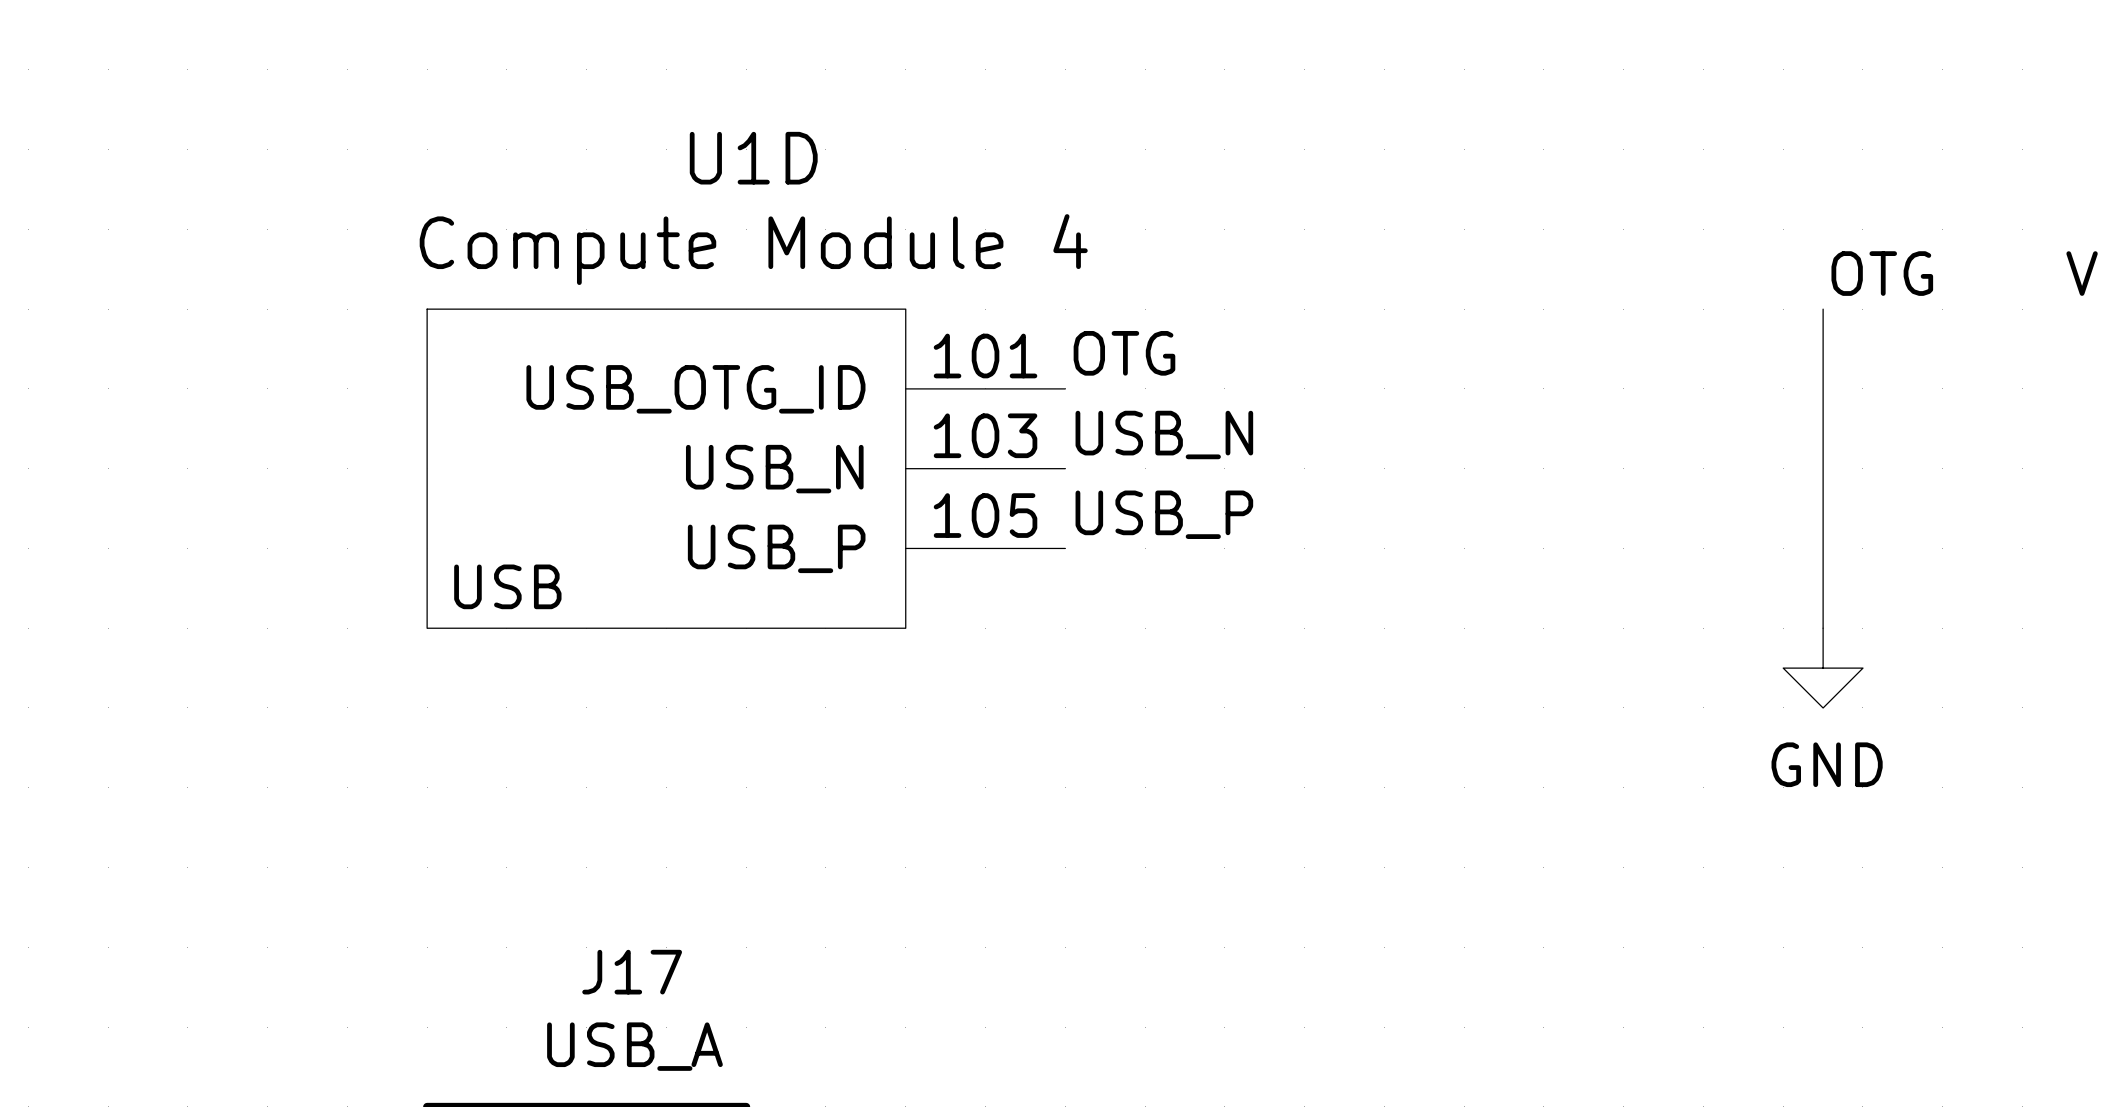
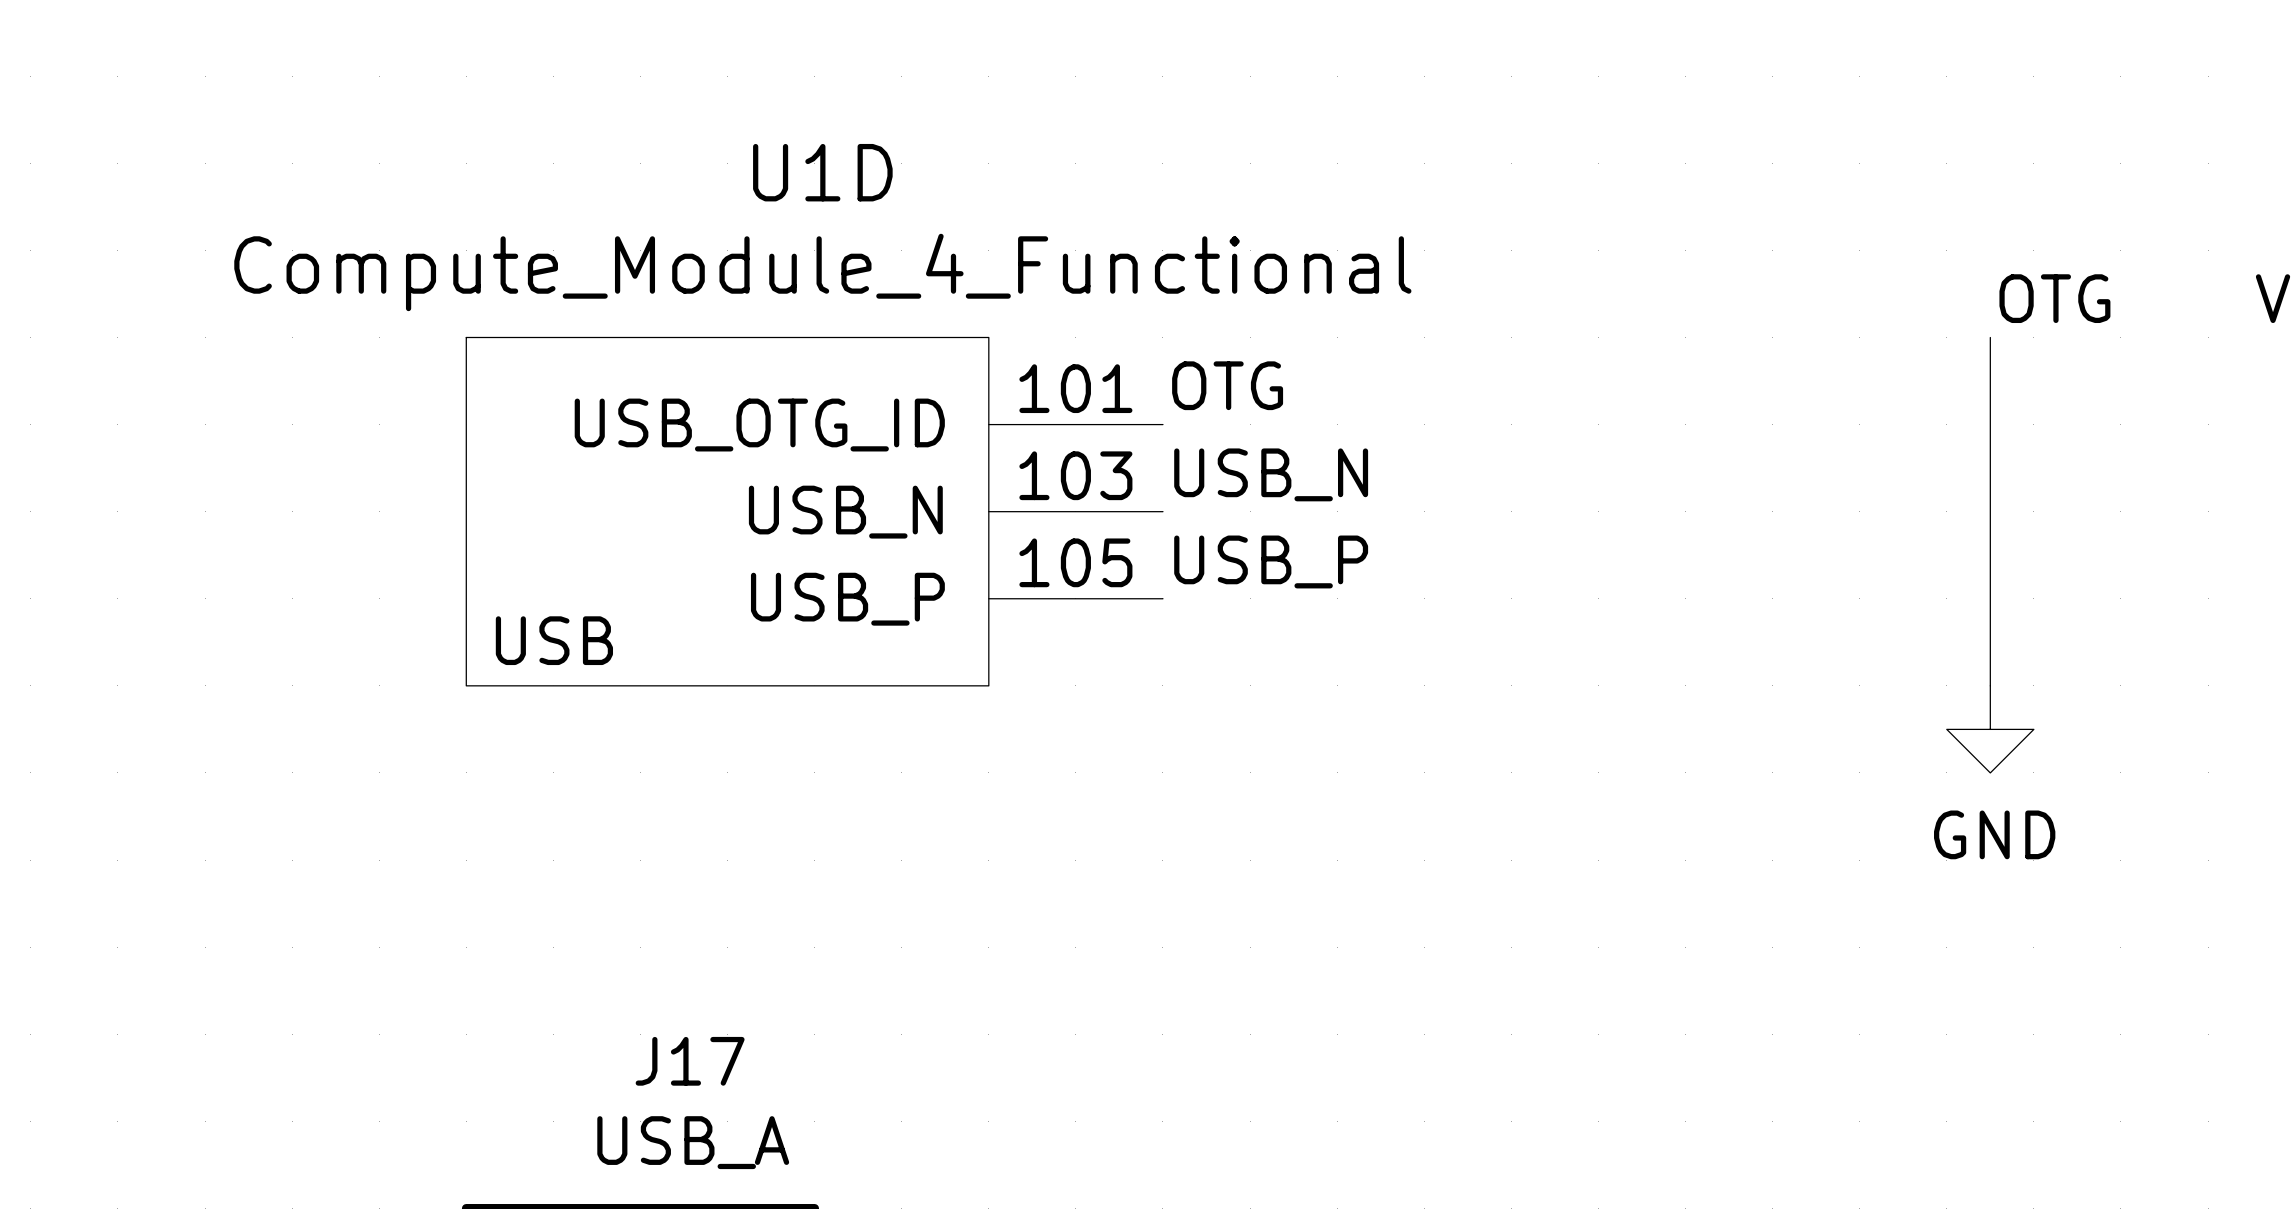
U1D value: Compute Module 4 (753, 249) -> Compute_Module_4_Functional (822, 272)

